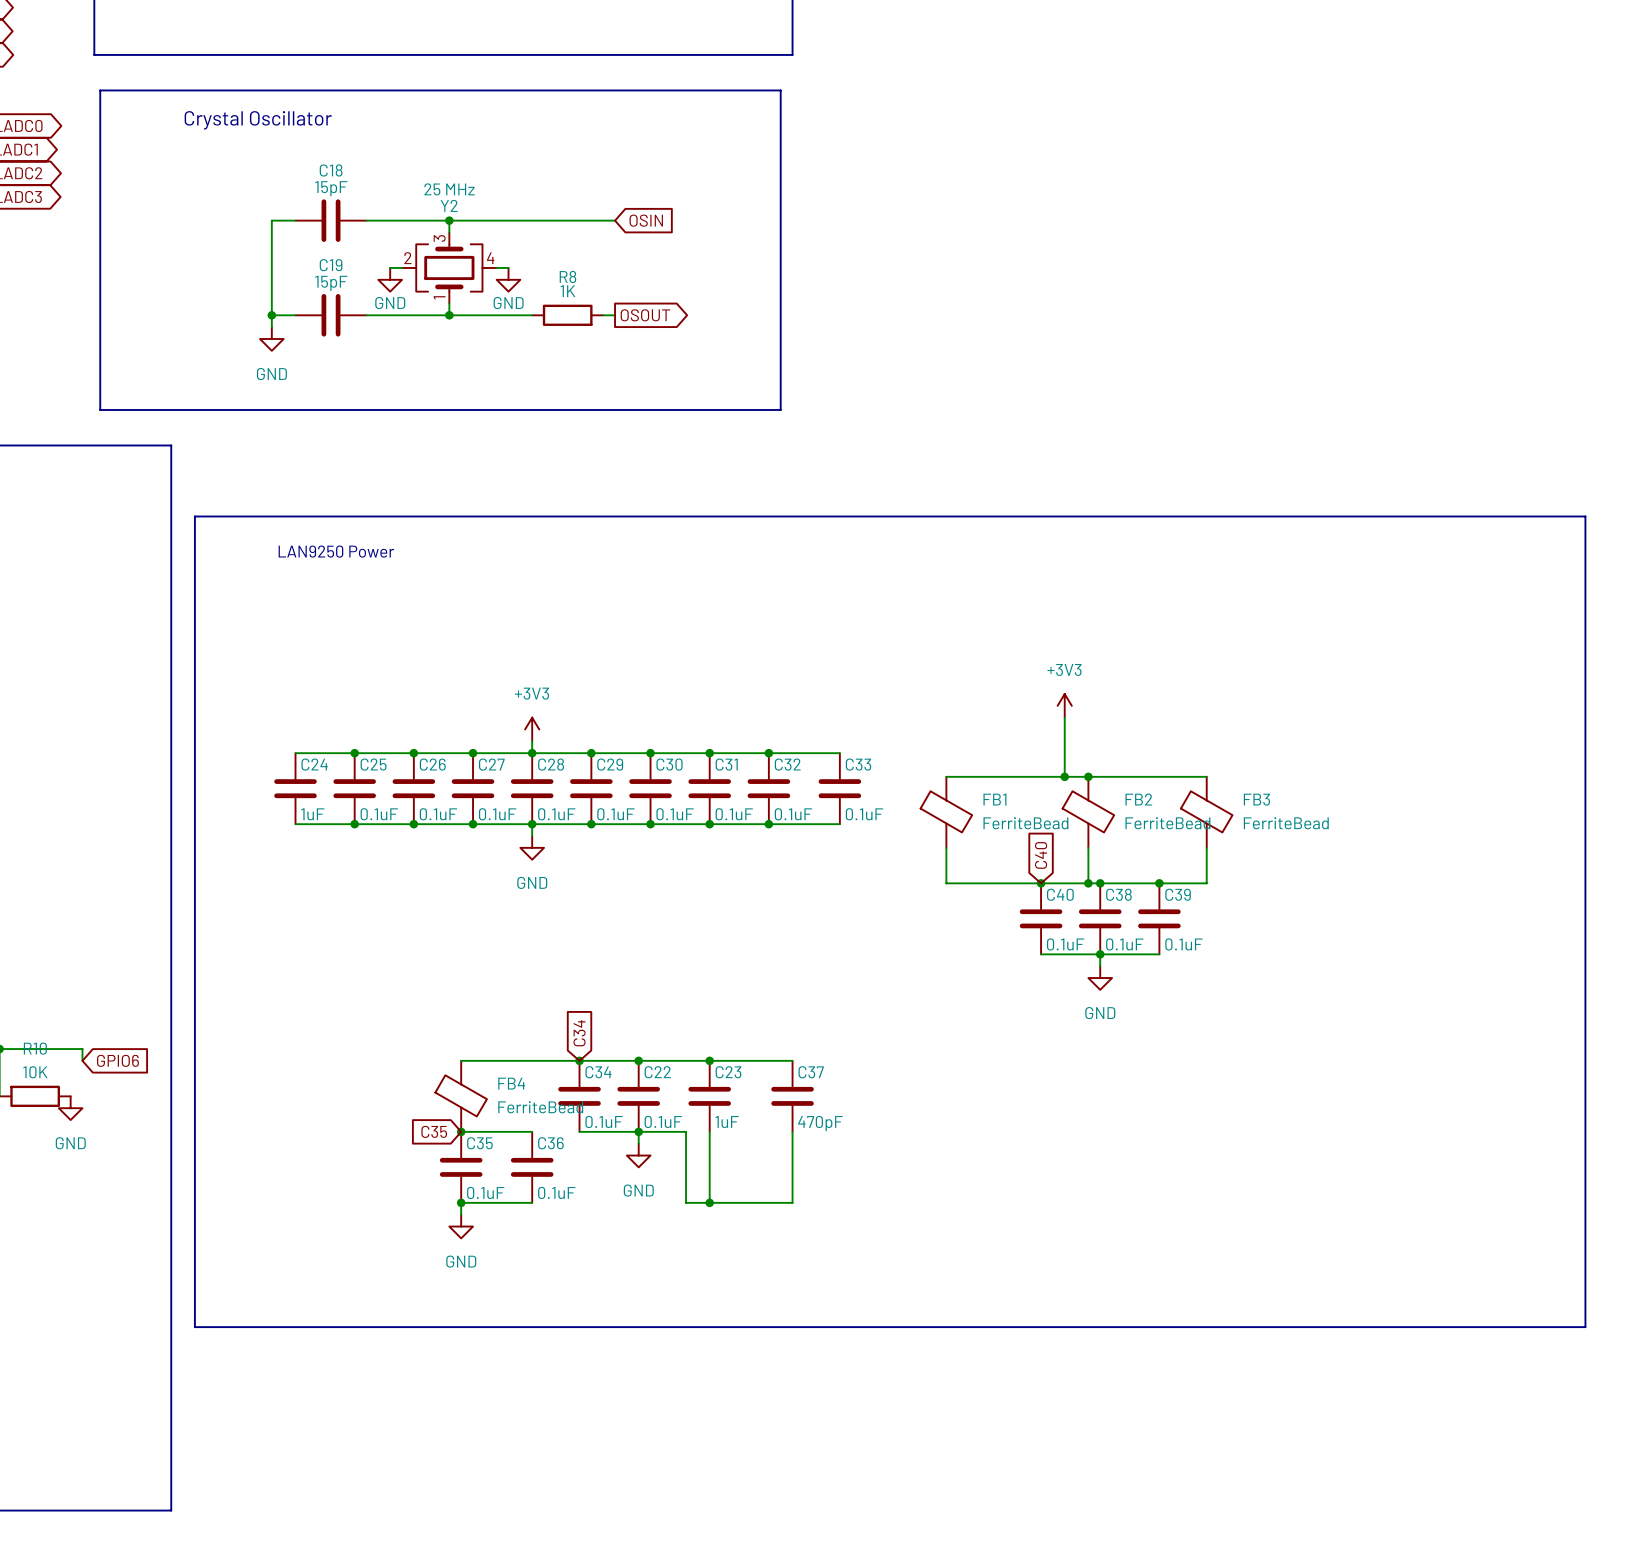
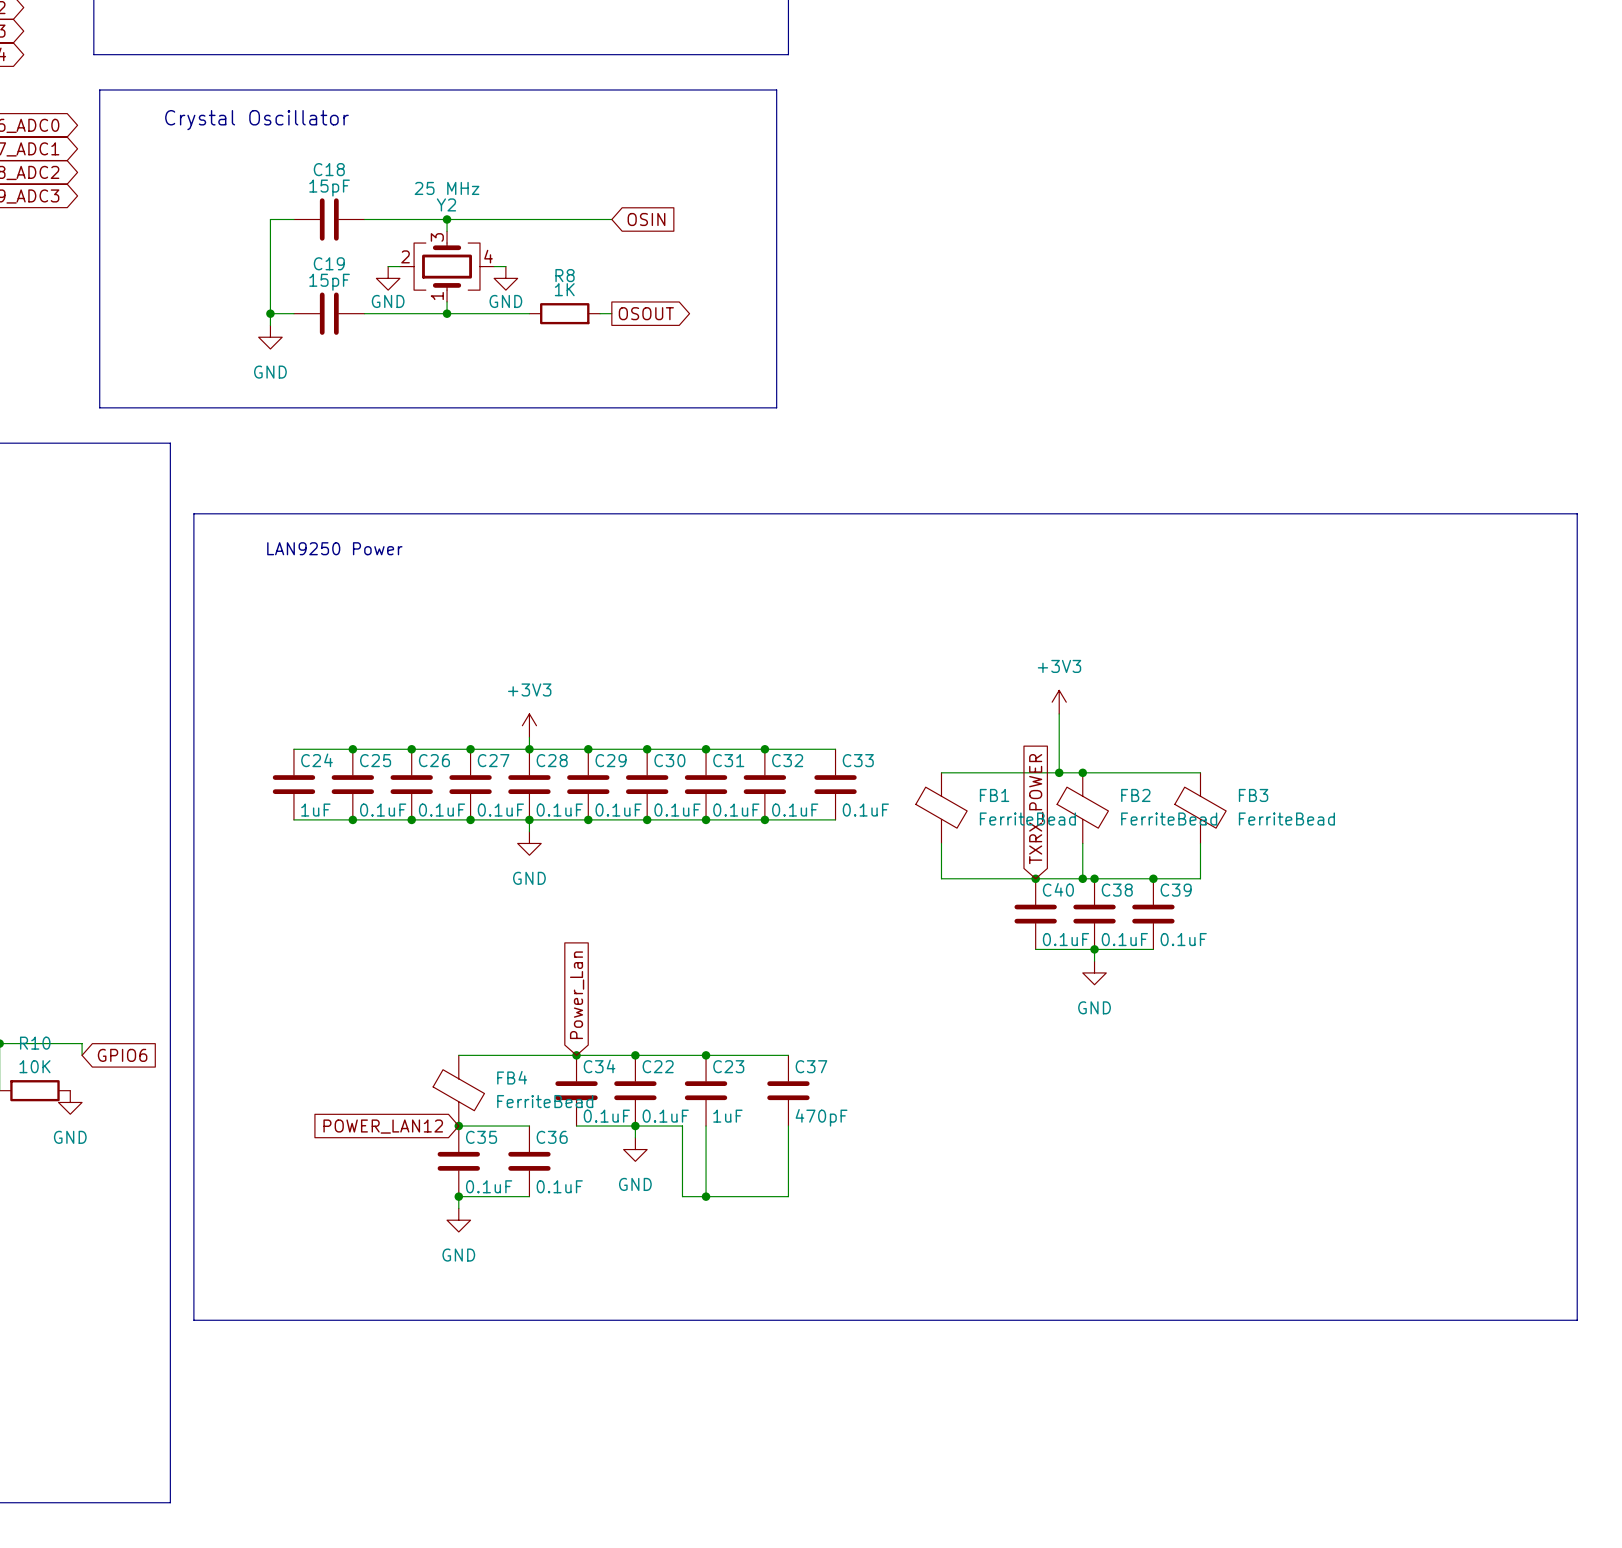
global label: C40 (1041, 855) -> TXRX_POWER (1036, 809)
global label: C34 (579, 1033) -> Power_Lan (577, 995)
global label: C35 (434, 1131) -> POWER_LAN12 (383, 1126)

